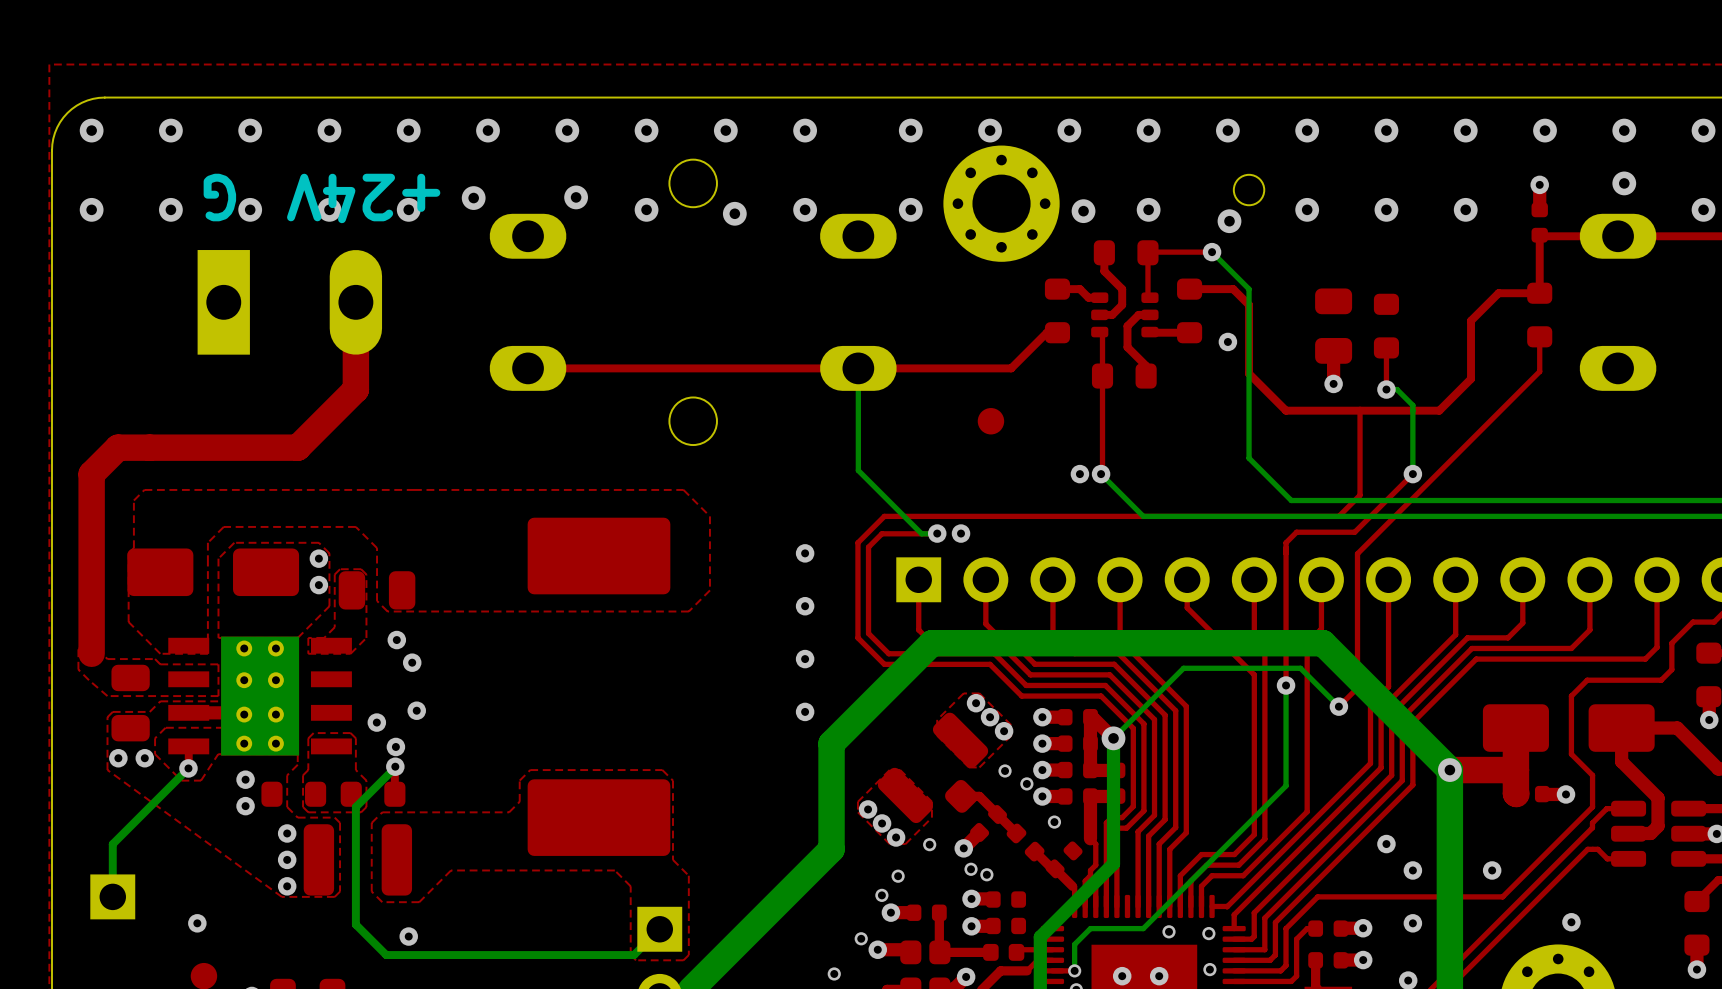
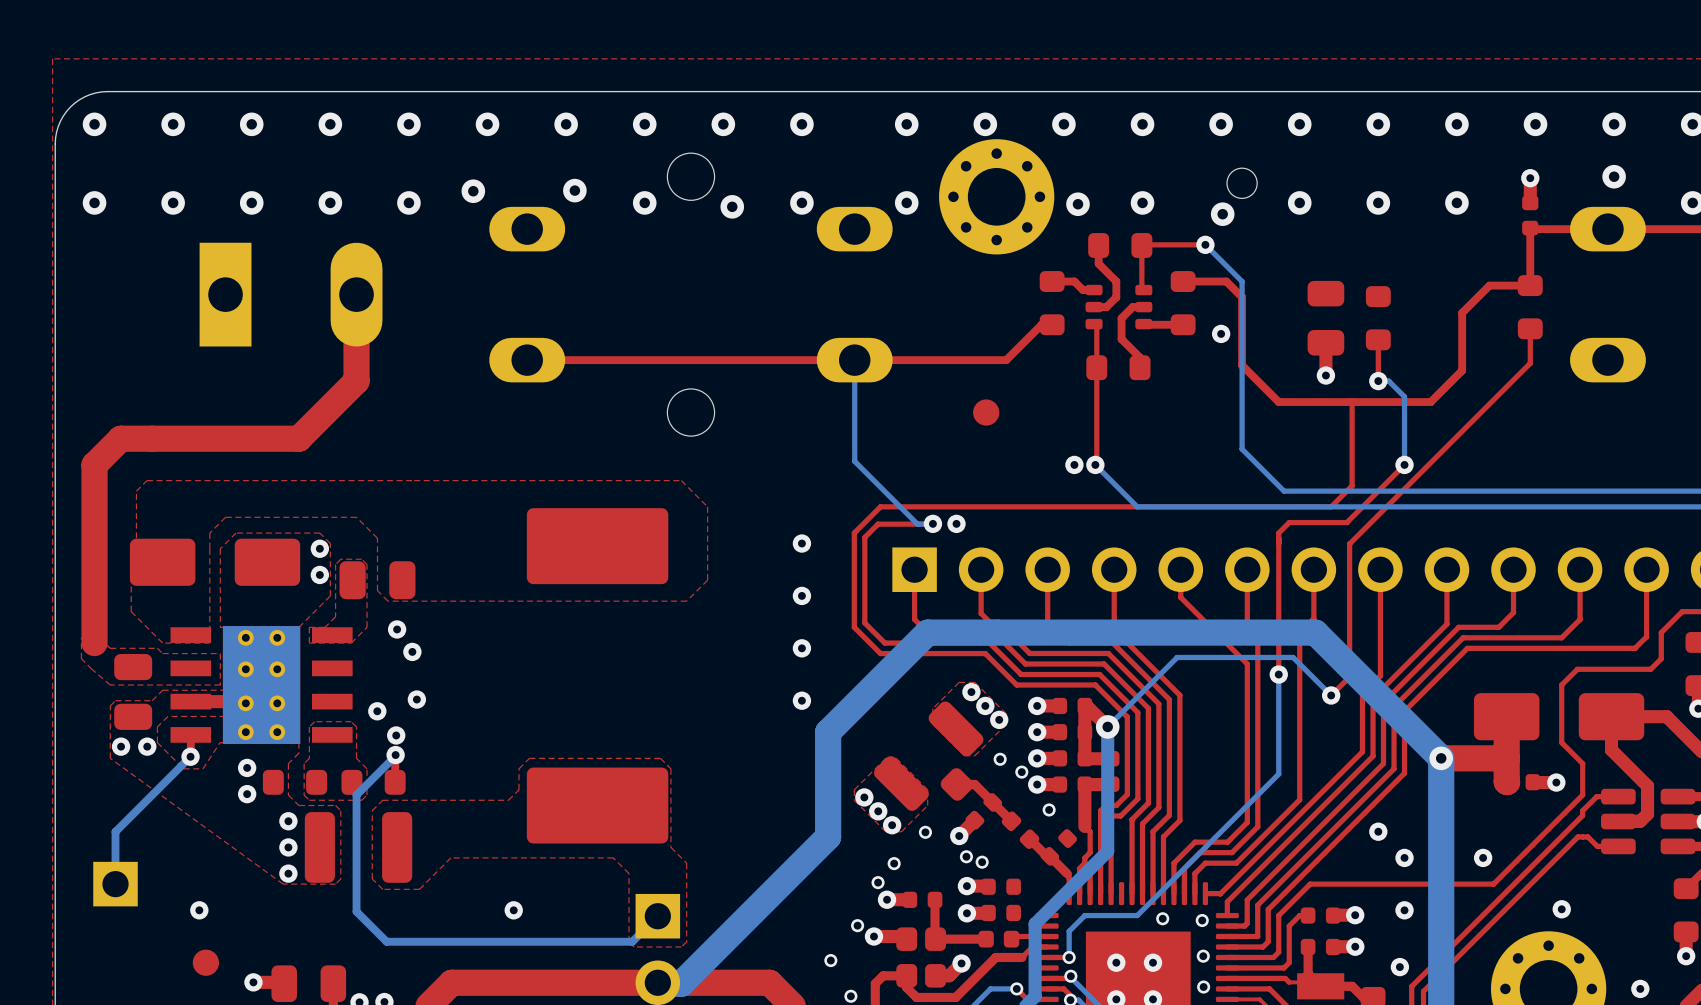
text: G (219, 197) -> none
text: +24V (363, 198) -> none
via position: (408, 936) -> (513, 910)

